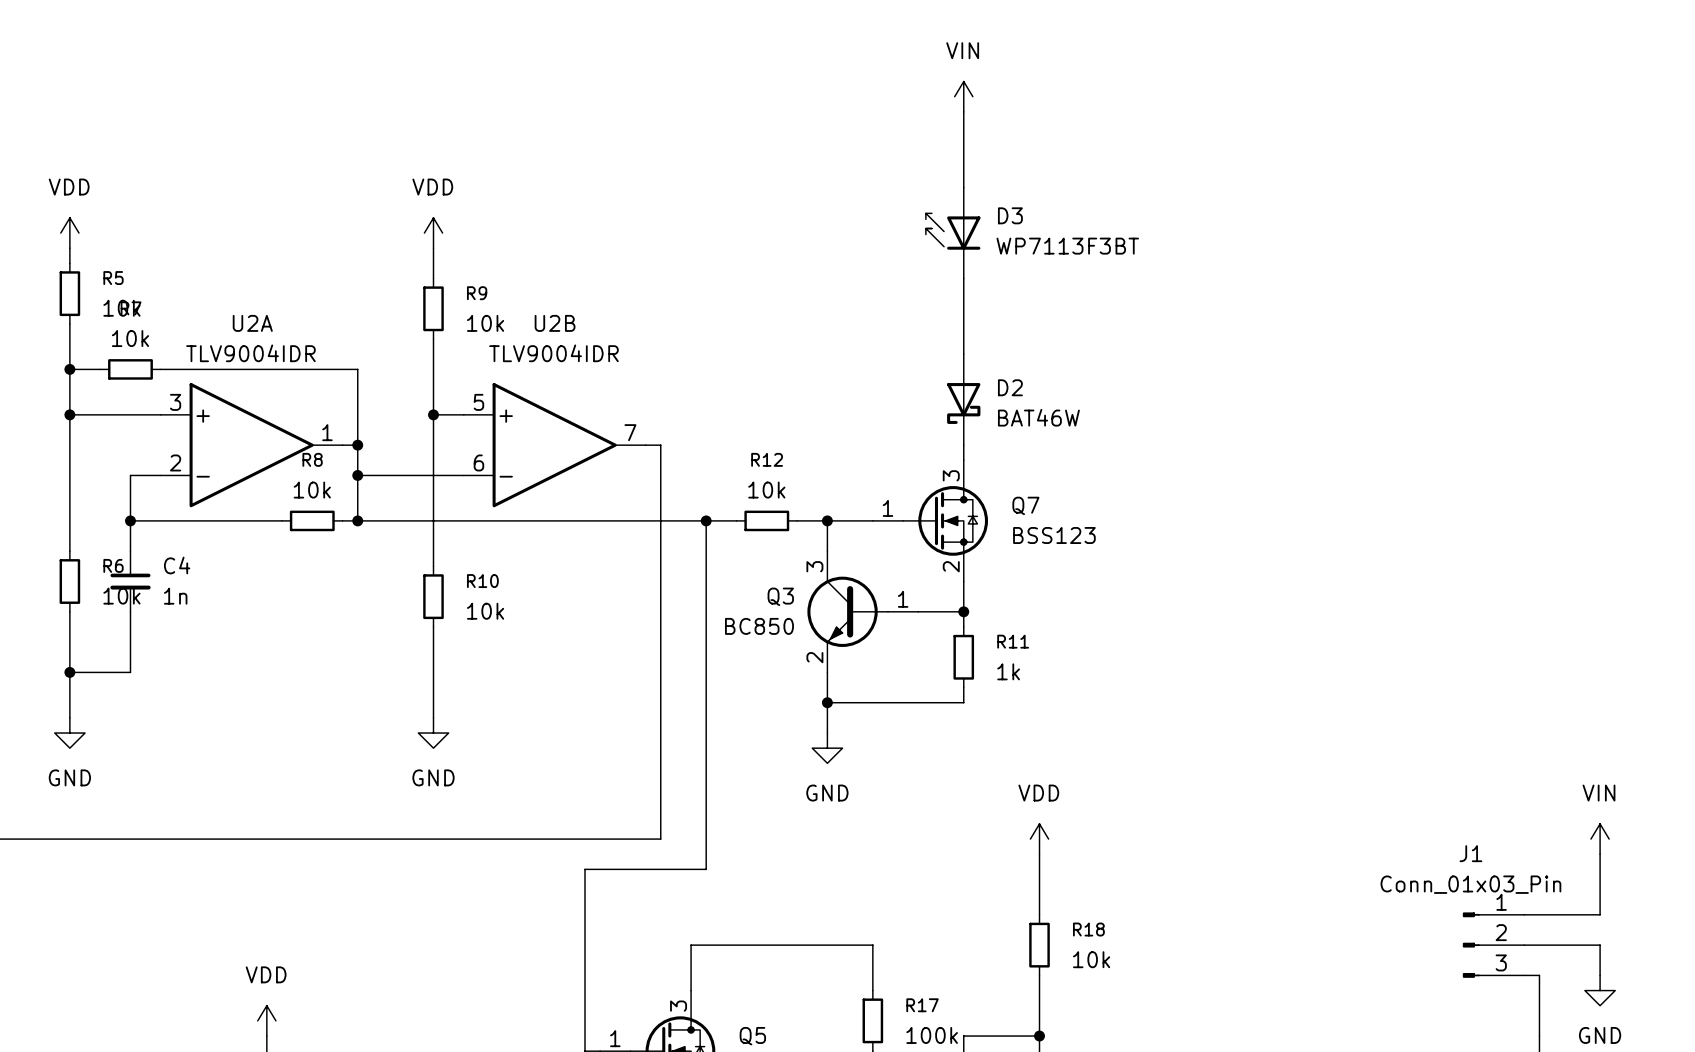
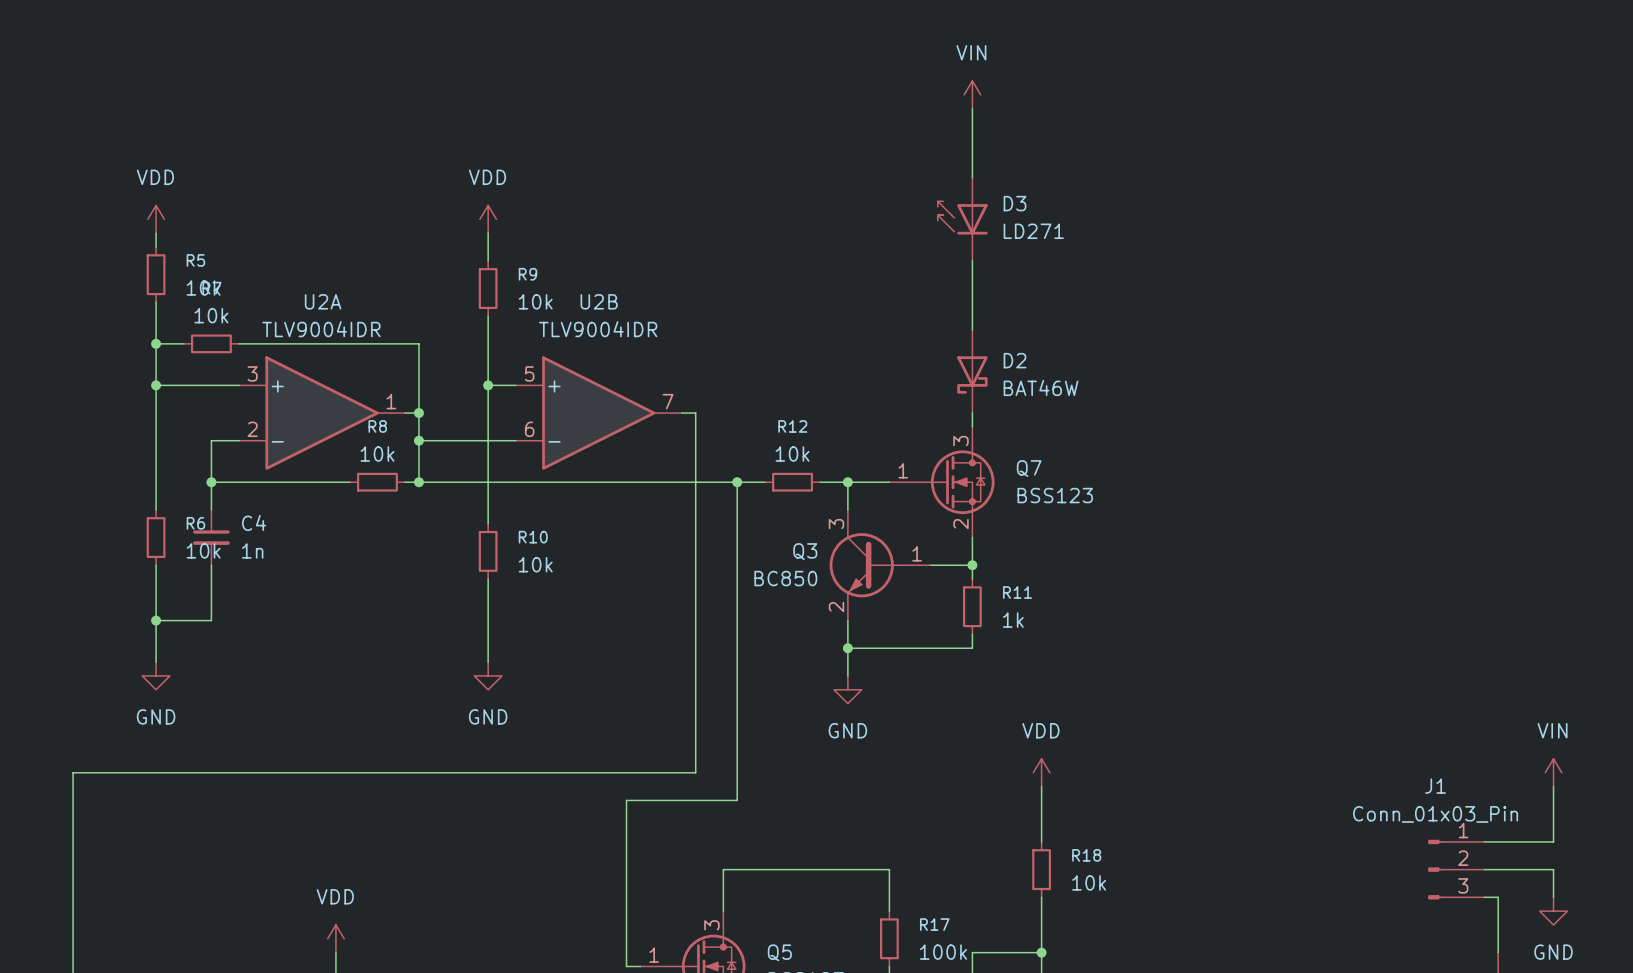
D3 value: WP7113F3BT (1067, 246) -> LD271 (1033, 231)

